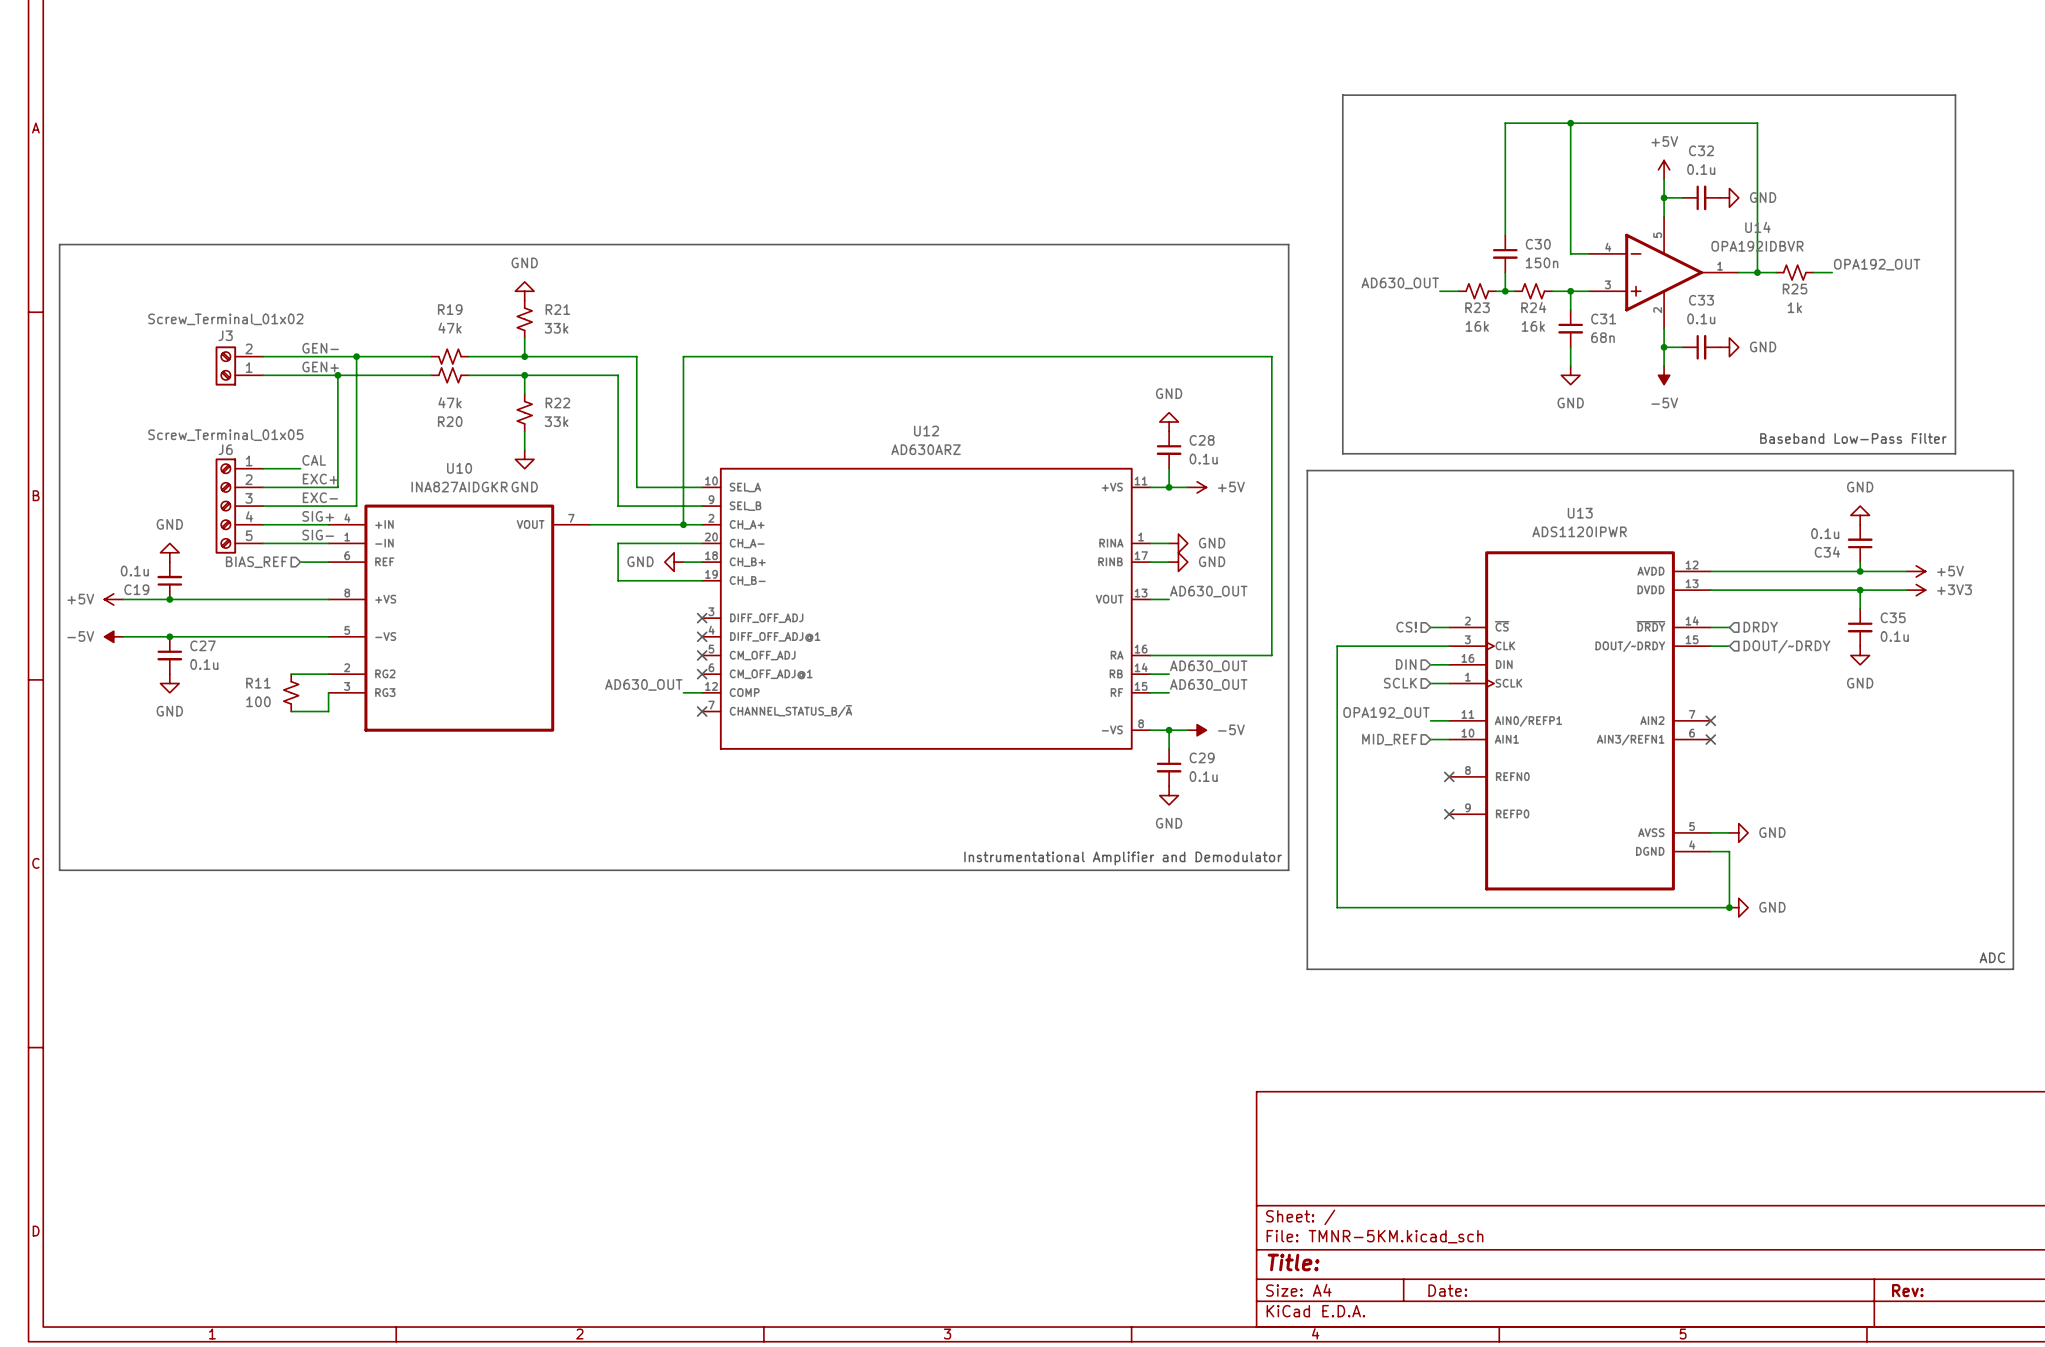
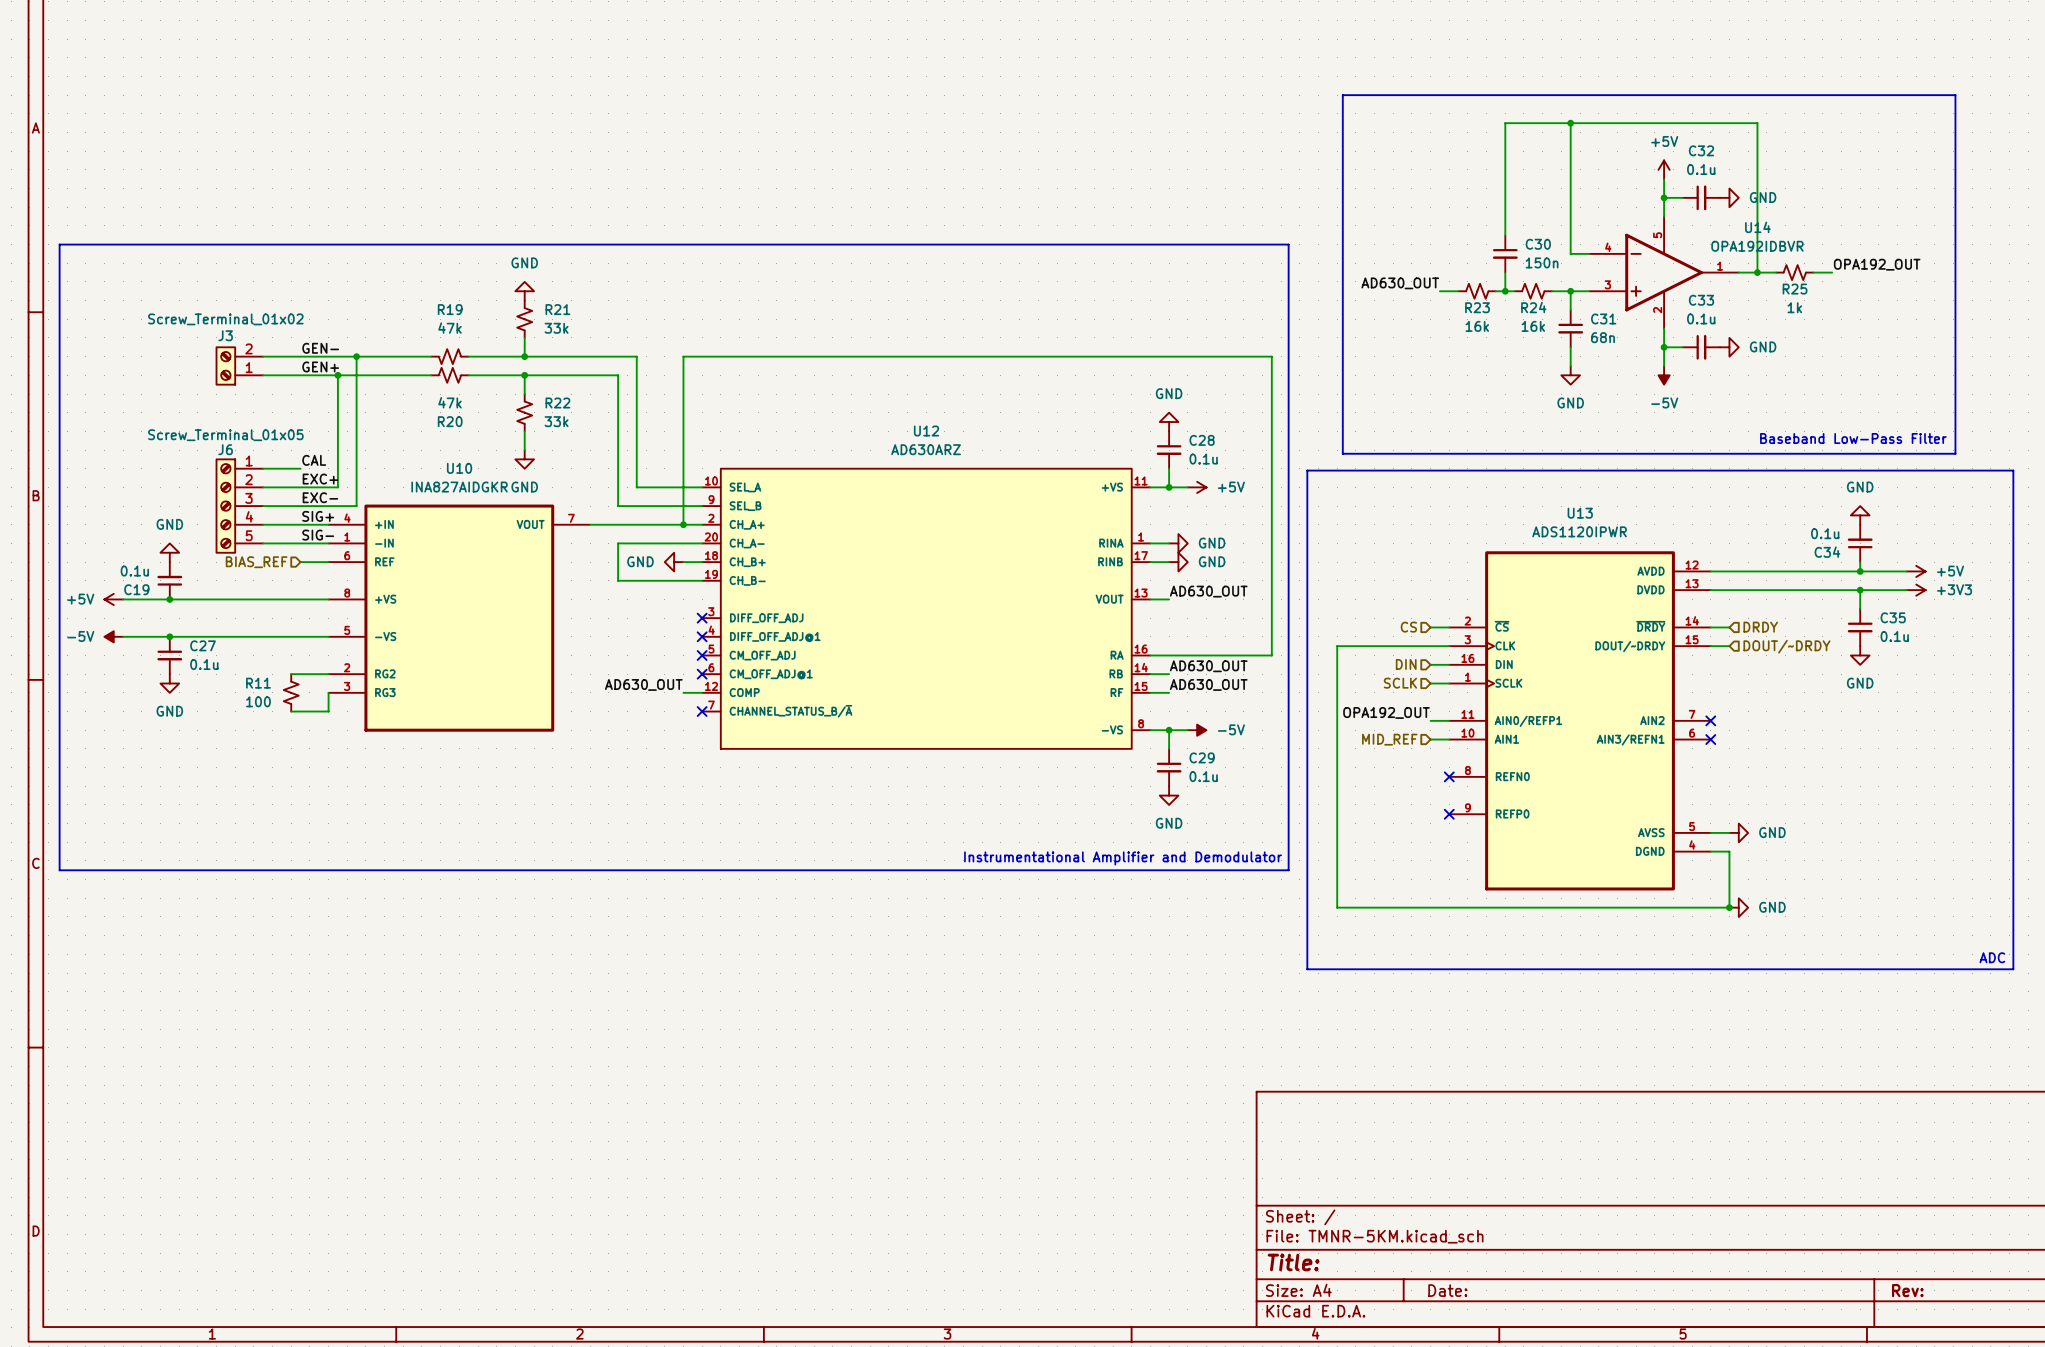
hierarchical label: CS! (1406, 627) -> CS (1408, 627)

